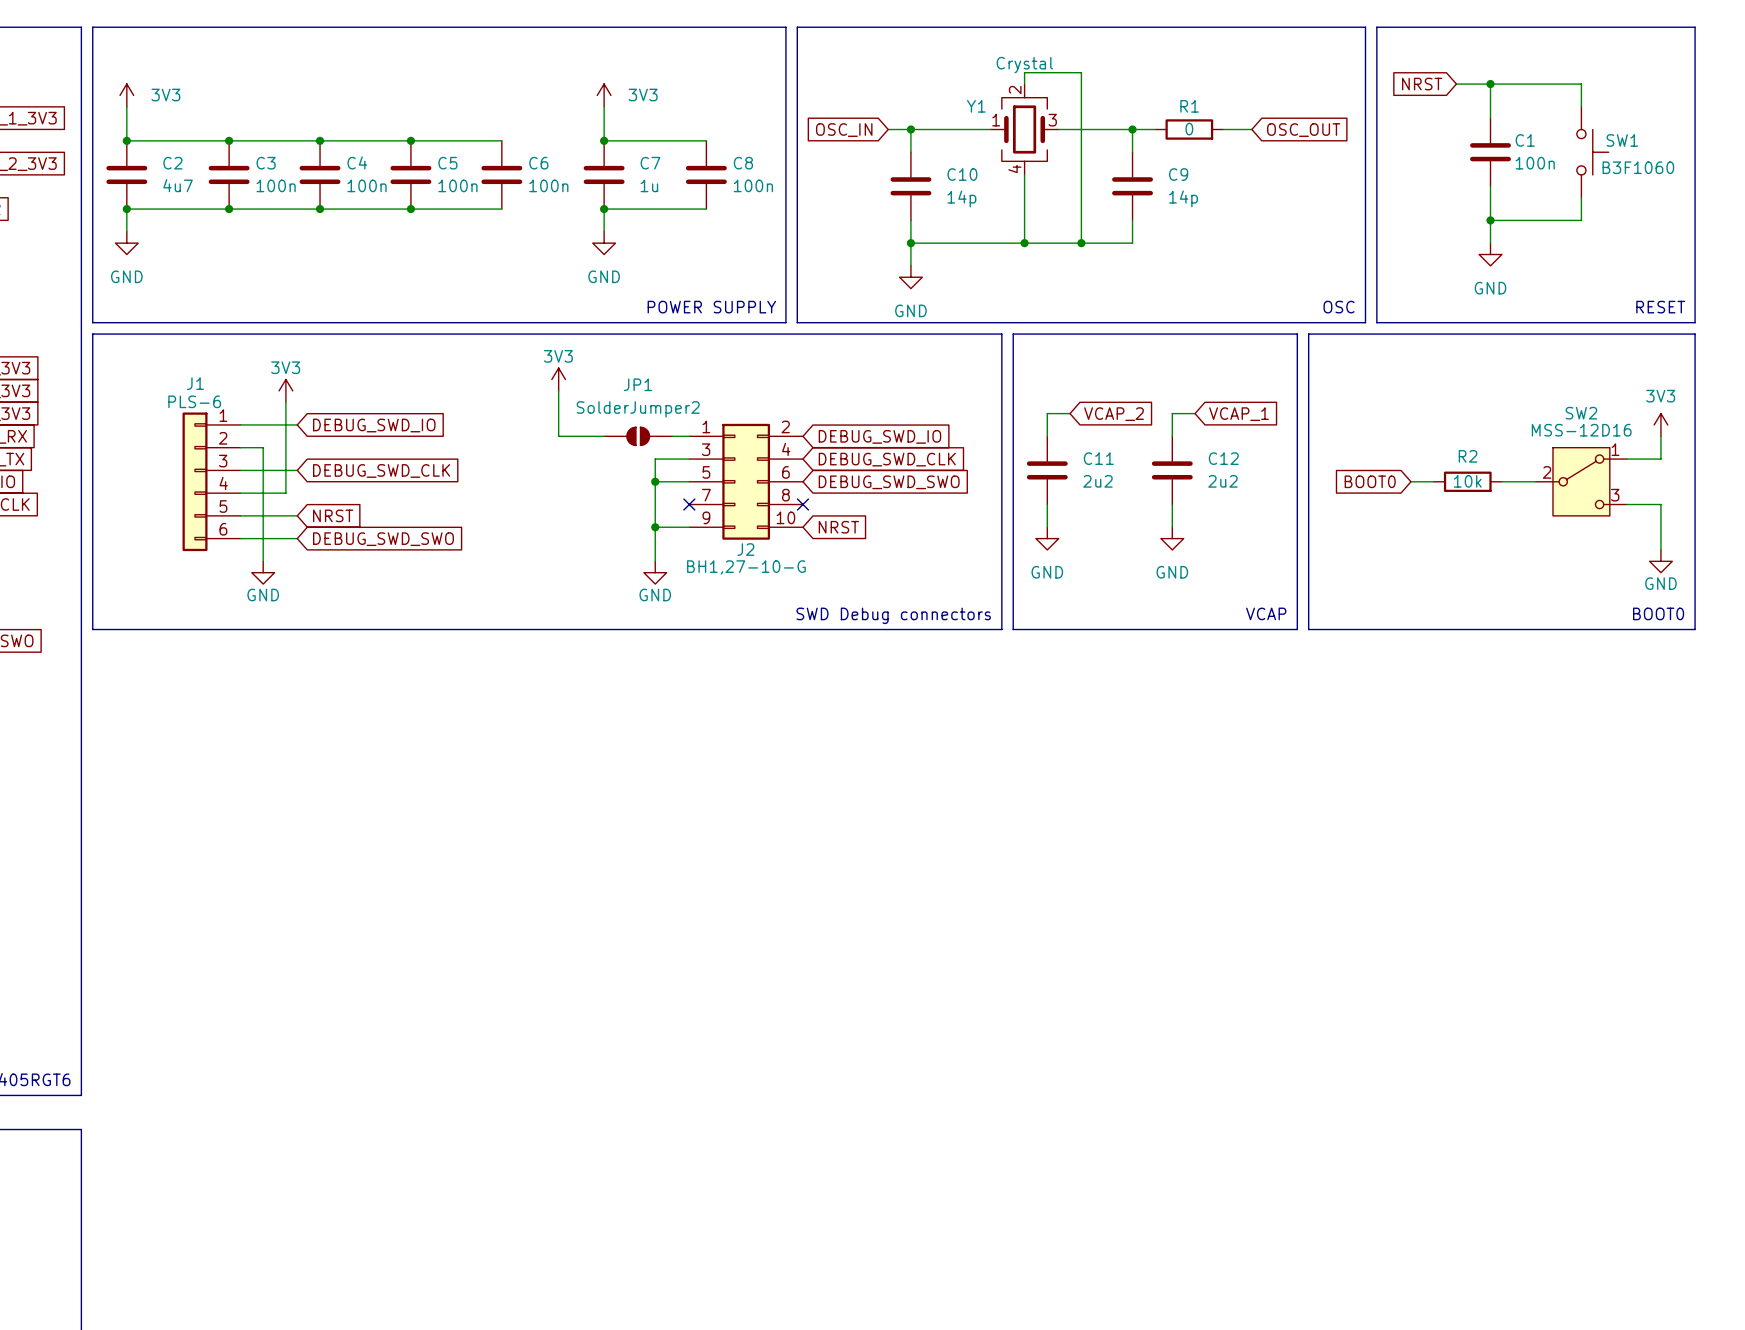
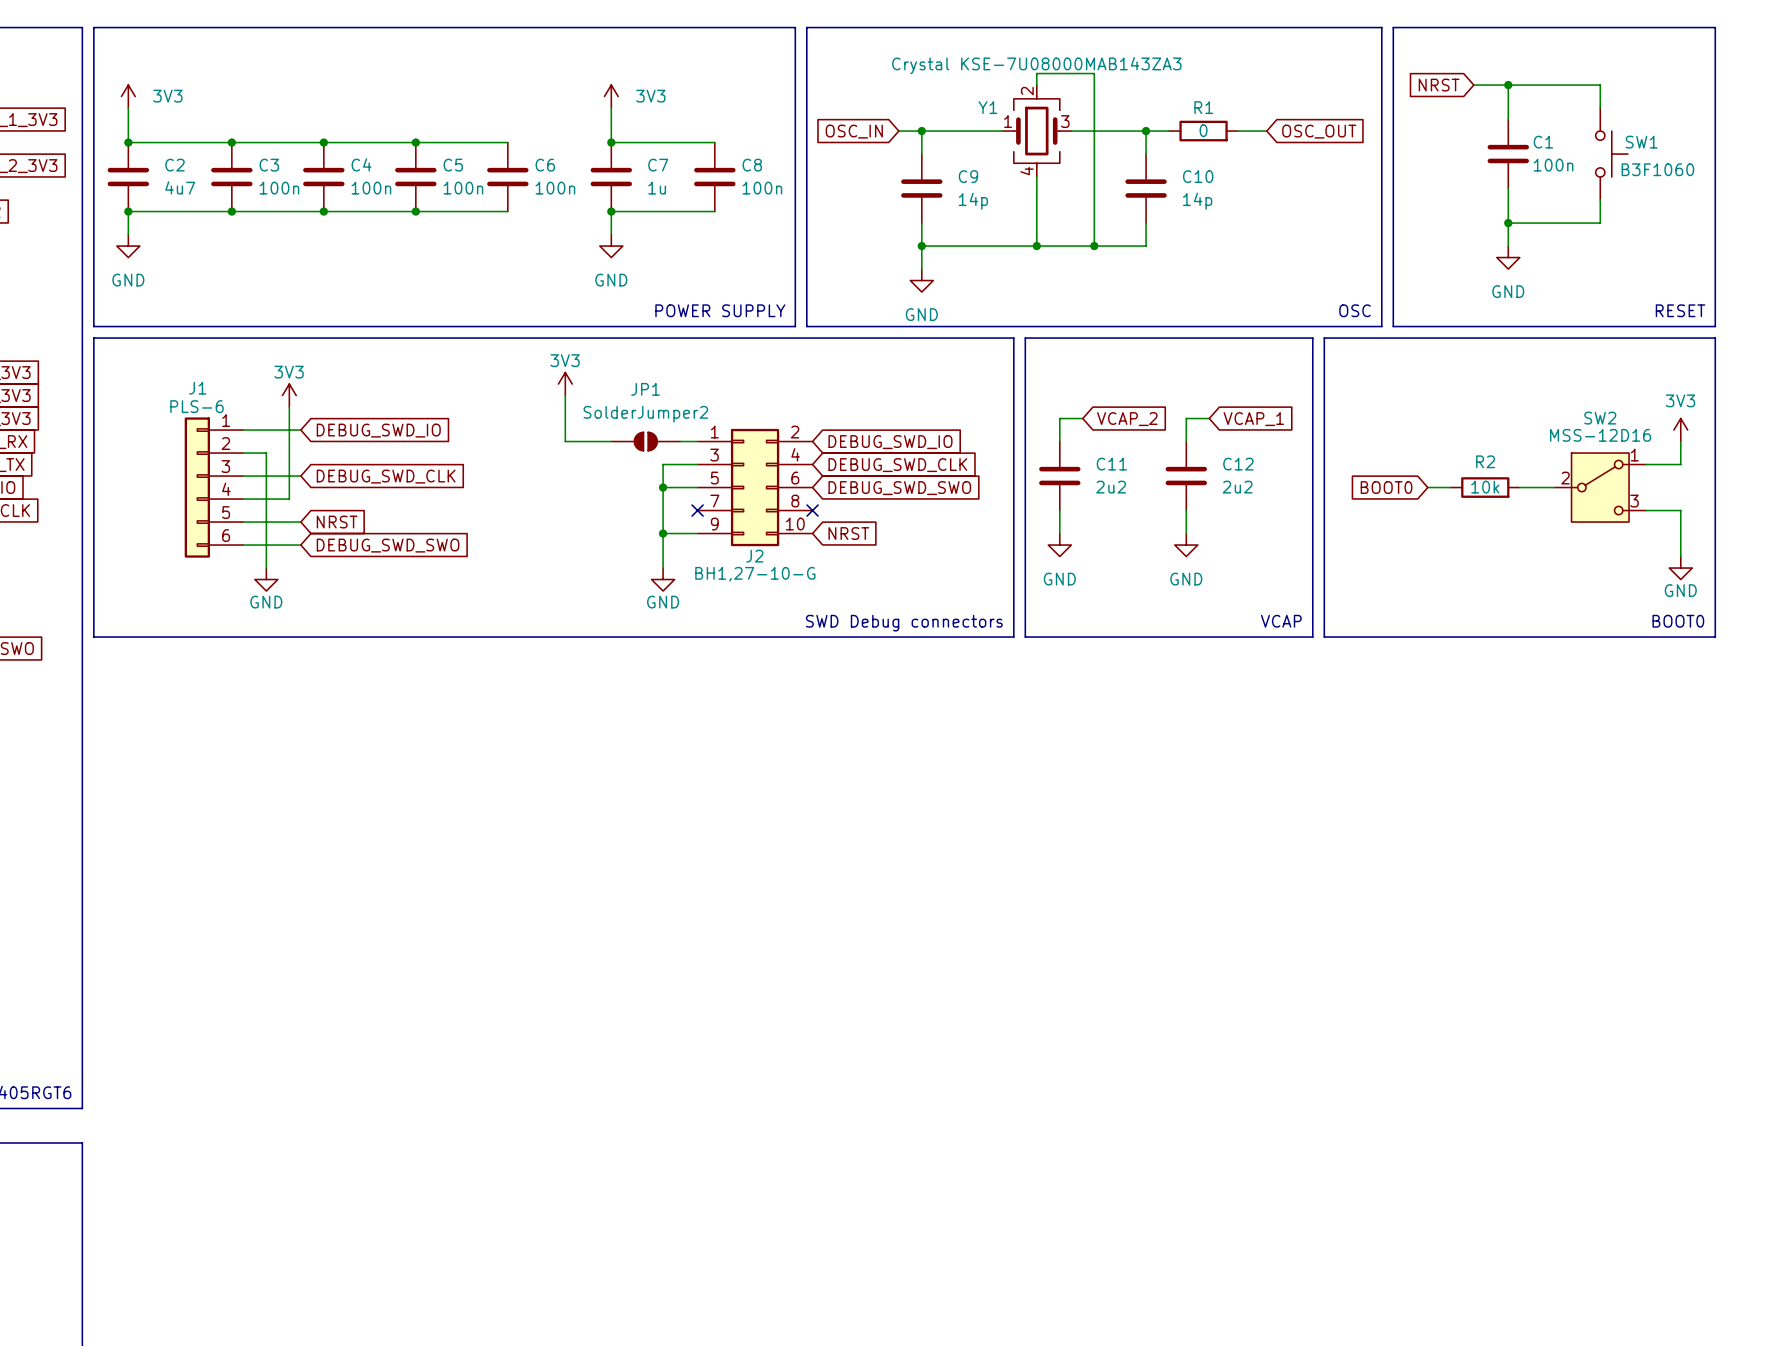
Y1 value: Crystal (1024, 65) -> Crystal KSE-7U08000MAB143ZA3 (1036, 65)
C10 name: C10 (962, 174) -> C9 (968, 176)
C9 name: C9 (1178, 174) -> C10 (1198, 176)

